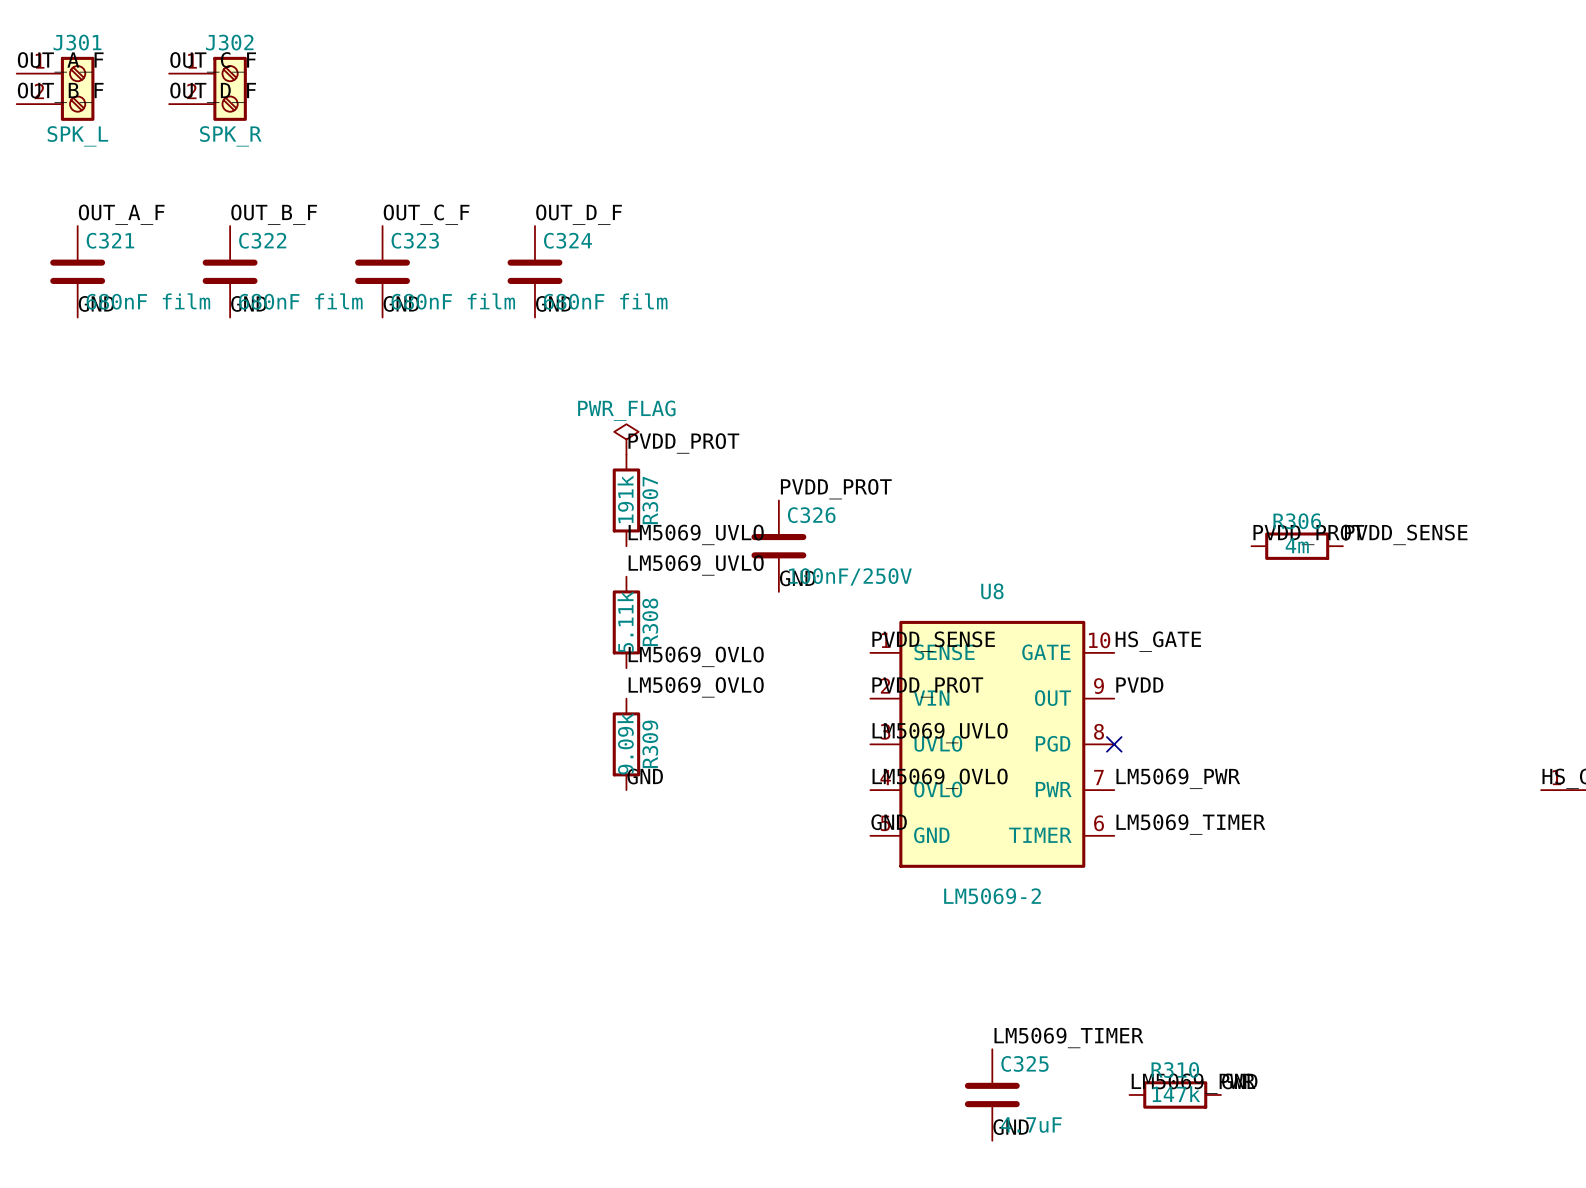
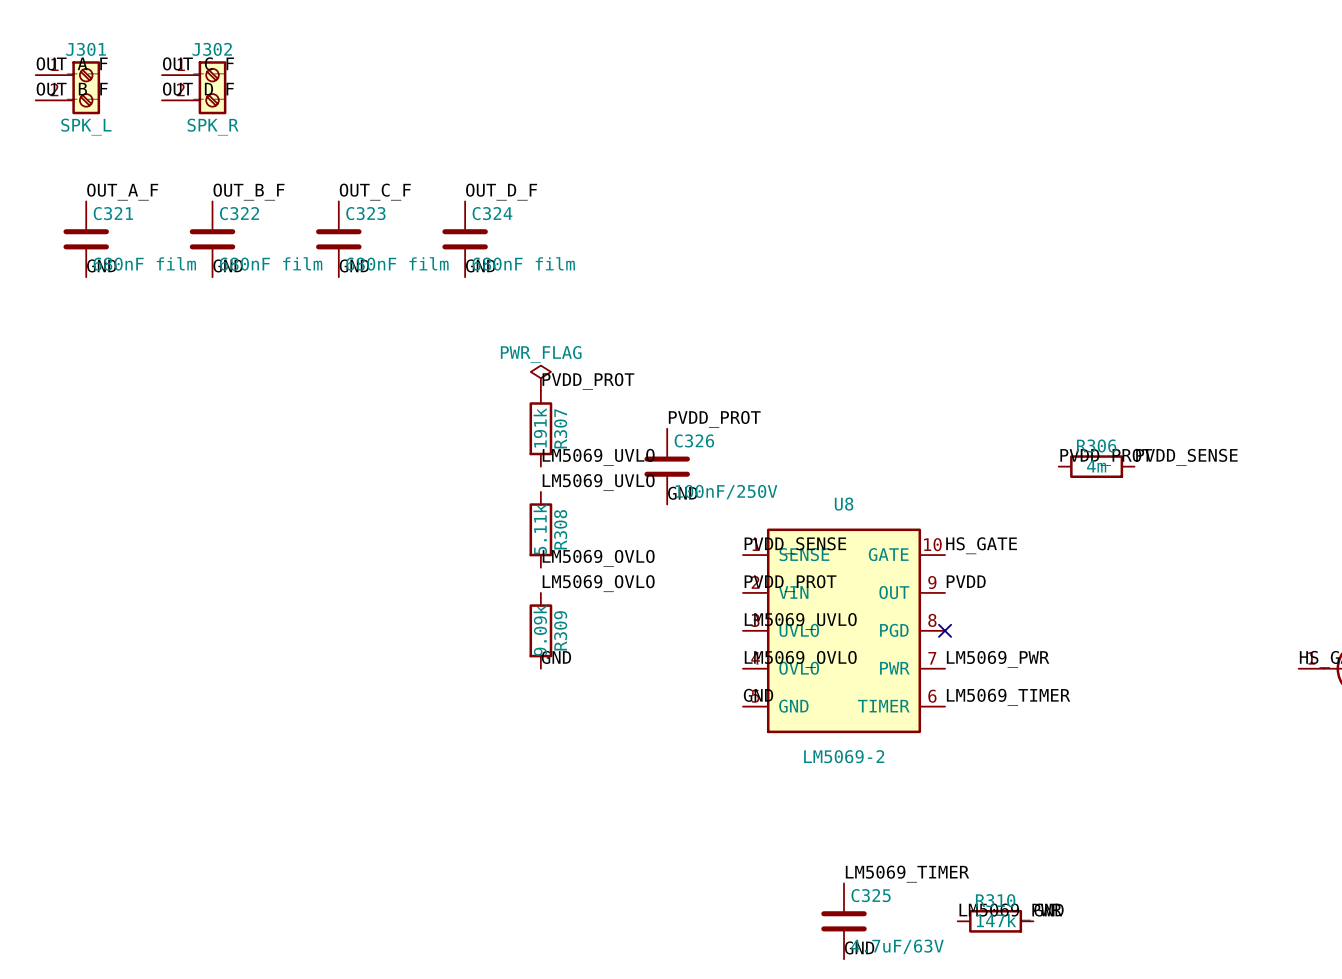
C325 value: 4.7uF (1031, 1125) -> 4.7uF/63V (897, 946)

